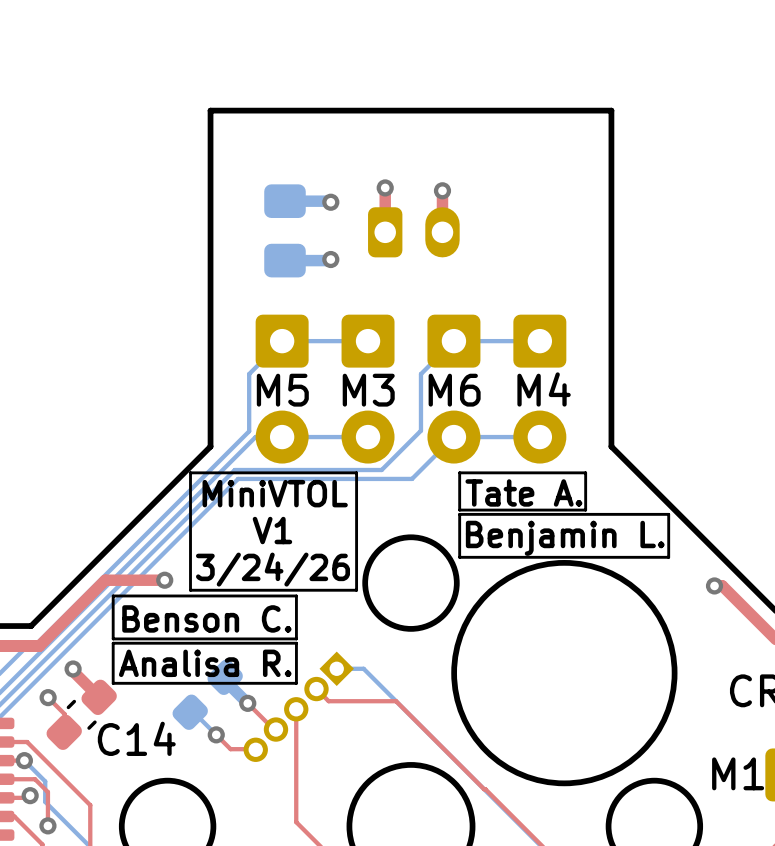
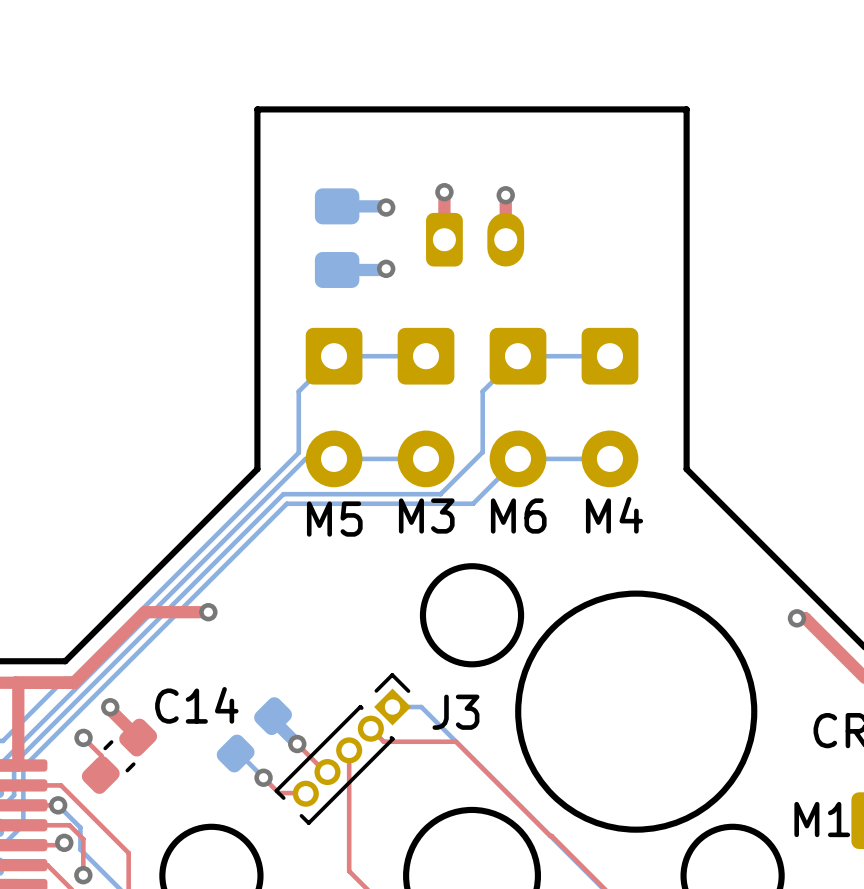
M4 name position: M4 (544, 389) -> M4 (614, 515)
M5 name position: M5 (282, 390) -> M5 (334, 519)
M3 name position: M3 (368, 390) -> M3 (426, 516)
M6 name position: M6 (454, 390) -> M6 (518, 516)
line: (190, 472) (356, 472) (356, 590) (190, 590) (190, 472) -> none
line: (459, 472) (585, 472) (585, 510) (459, 510) (459, 472) -> none
text: Tate A. (523, 492) -> none
text: MiniVTOL (275, 493) -> none
line: (459, 514) (459, 557) (668, 557) (668, 514) (459, 514) -> none
text: V1 (272, 530) -> none
text: Benjamin L. (565, 538) -> none
text: 3/24/26 (272, 569) -> none
line: (113, 595) (113, 638) (296, 638) (296, 595) (113, 595) -> none
text: Benson C. (206, 618) -> none
line: (113, 643) (296, 643) (296, 683) (113, 683) (113, 643) -> none
text: Analisa R. (205, 663) -> none
J3 side: bottom (298, 706) -> top (342, 749)
C14 name position: C14 (136, 738) -> C14 (196, 705)

